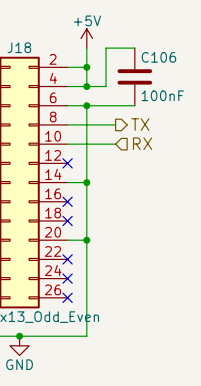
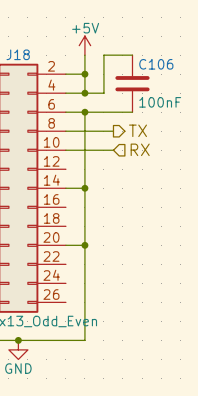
no-connect mark: (67, 163) -> none
no-connect mark: (67, 201) -> none
no-connect mark: (67, 220) -> none
no-connect mark: (67, 259) -> none
no-connect mark: (67, 278) -> none
no-connect mark: (67, 297) -> none

